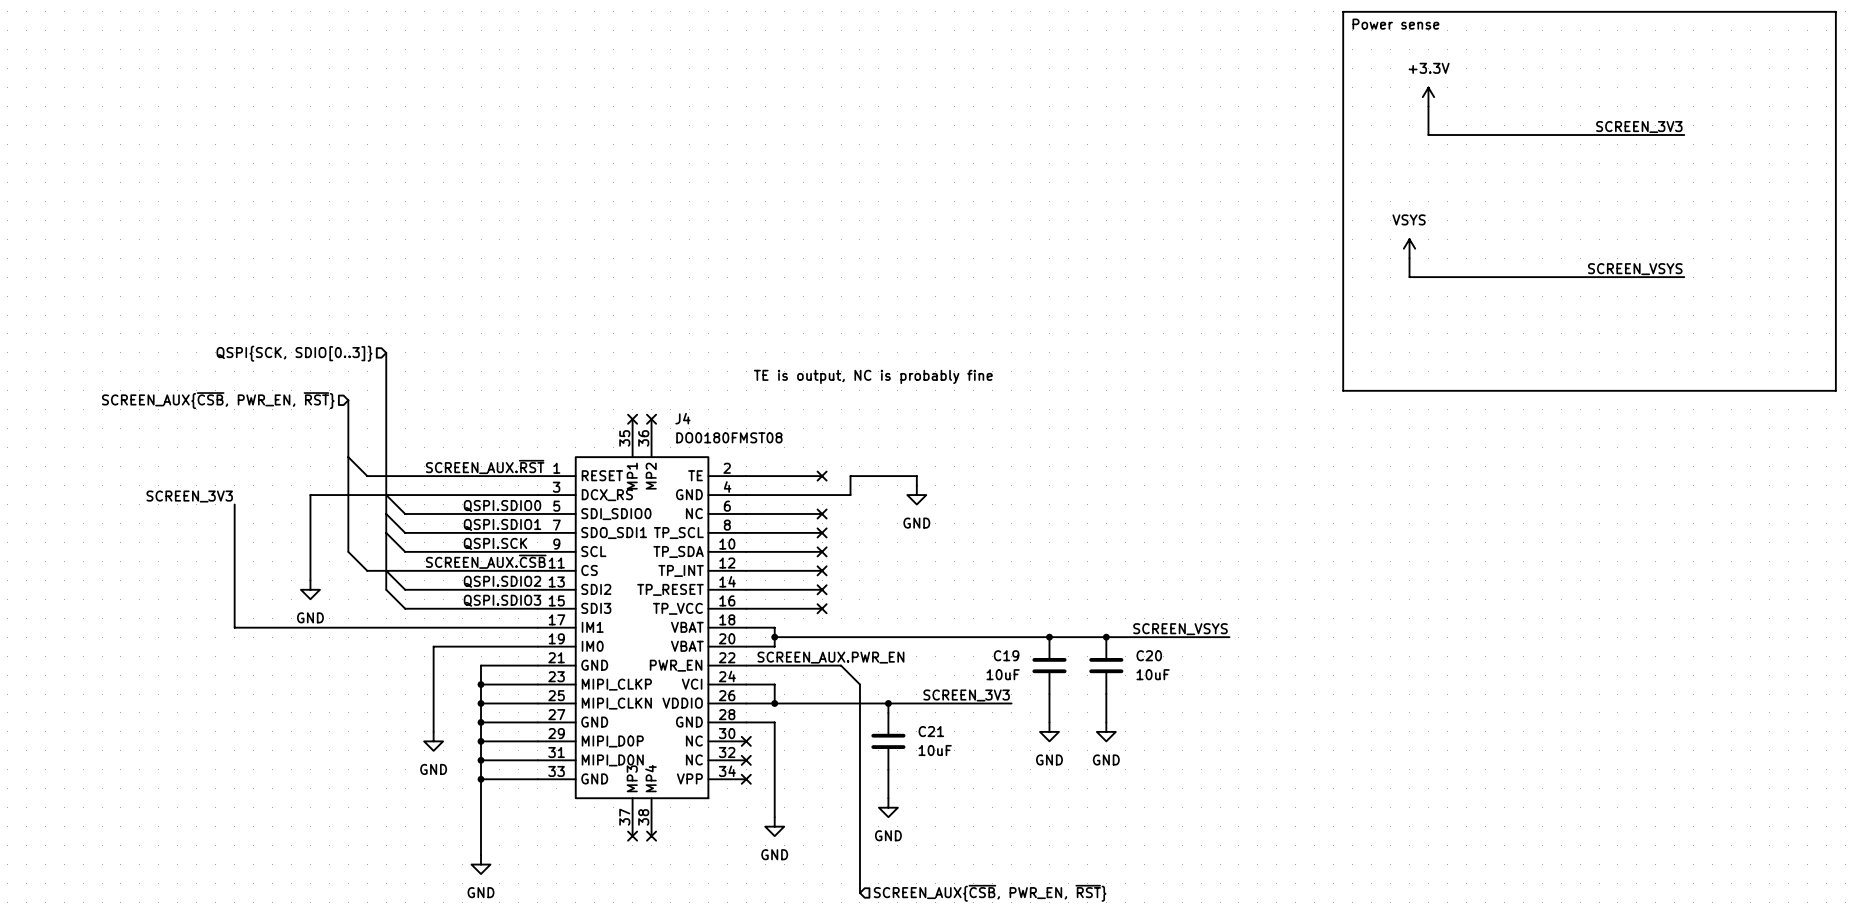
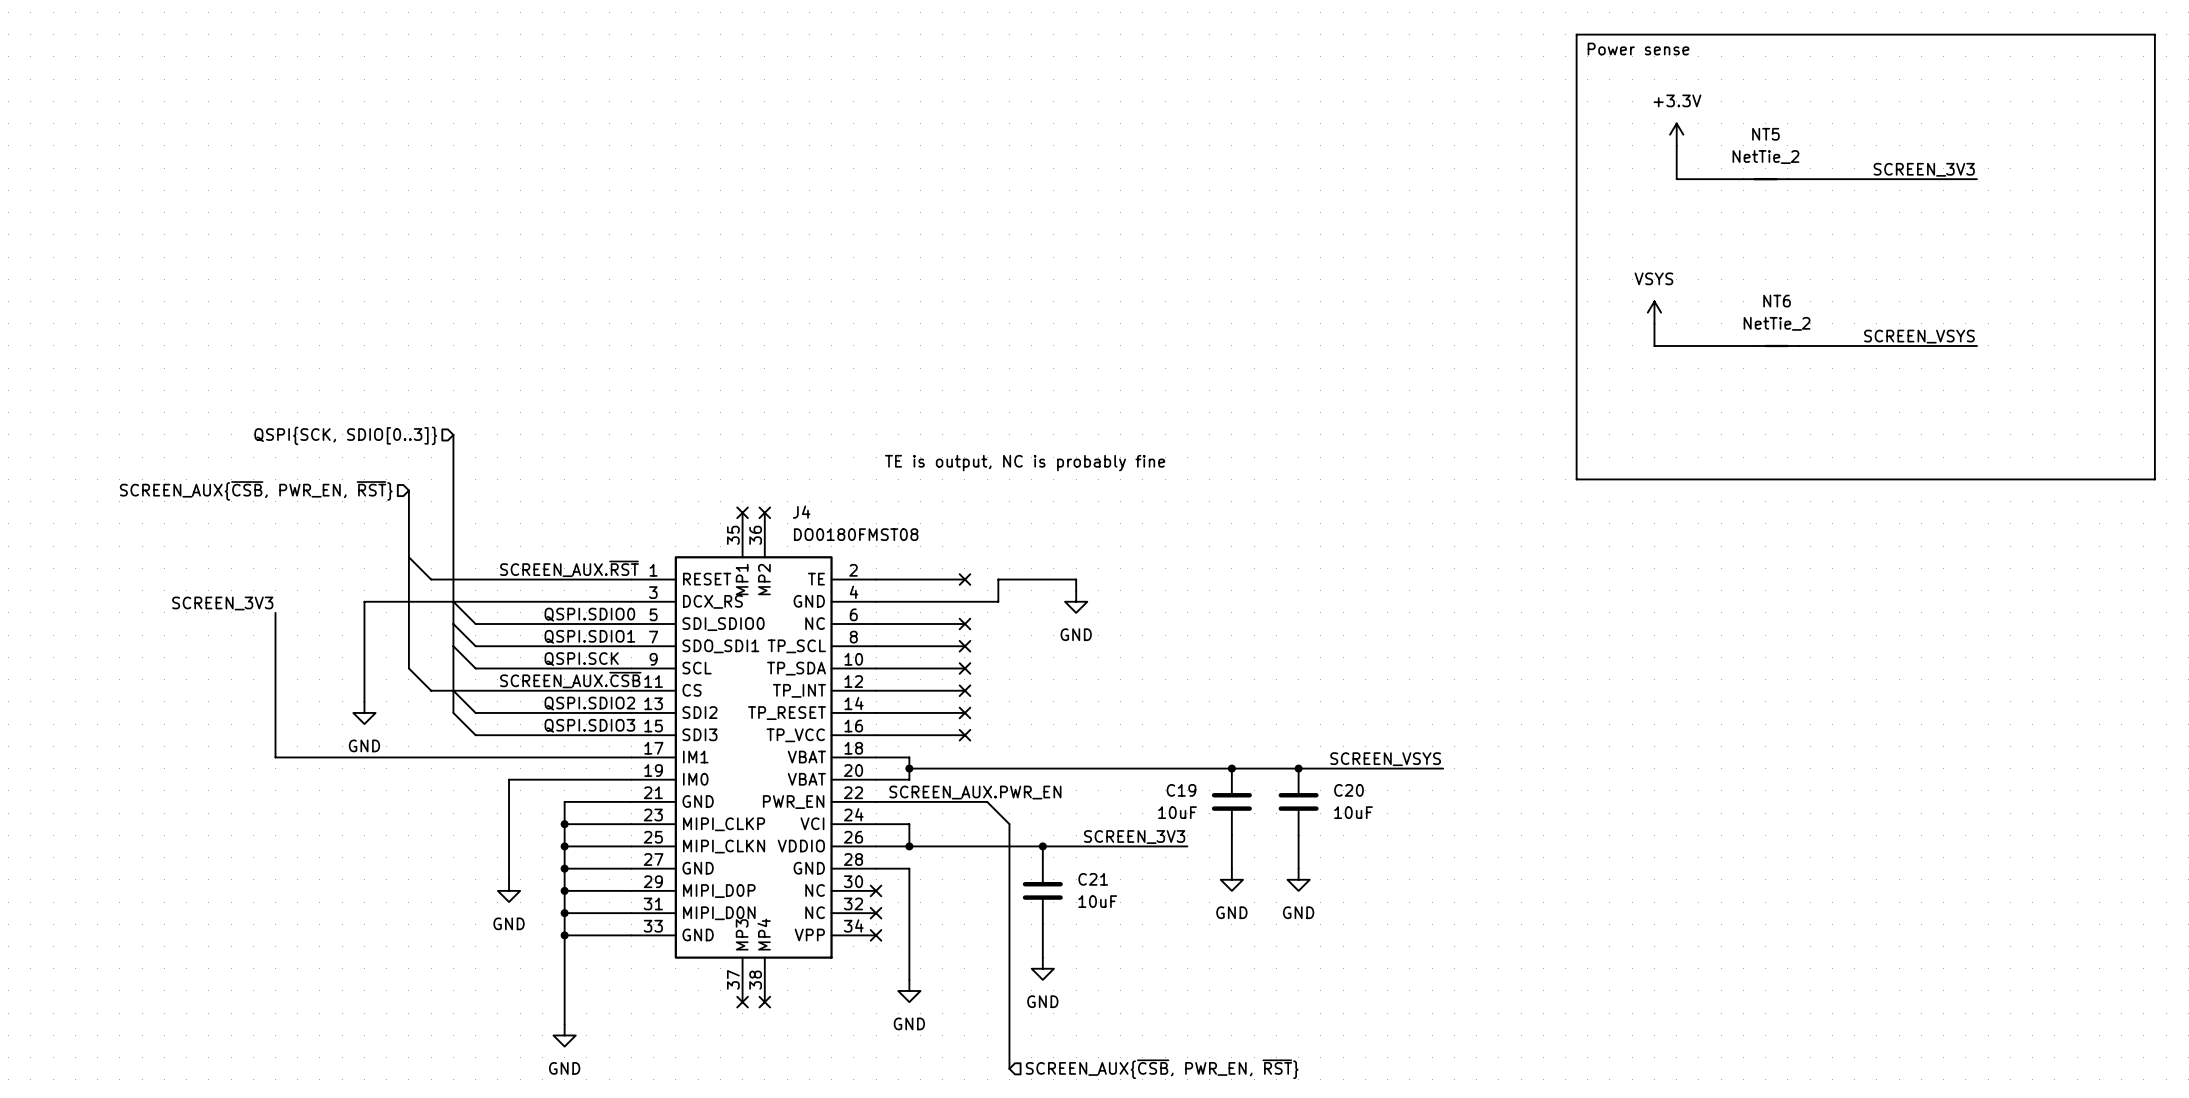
NT5: none -> NetTie_2 (1765, 179)
NT6: none -> NetTie_2 (1776, 345)

